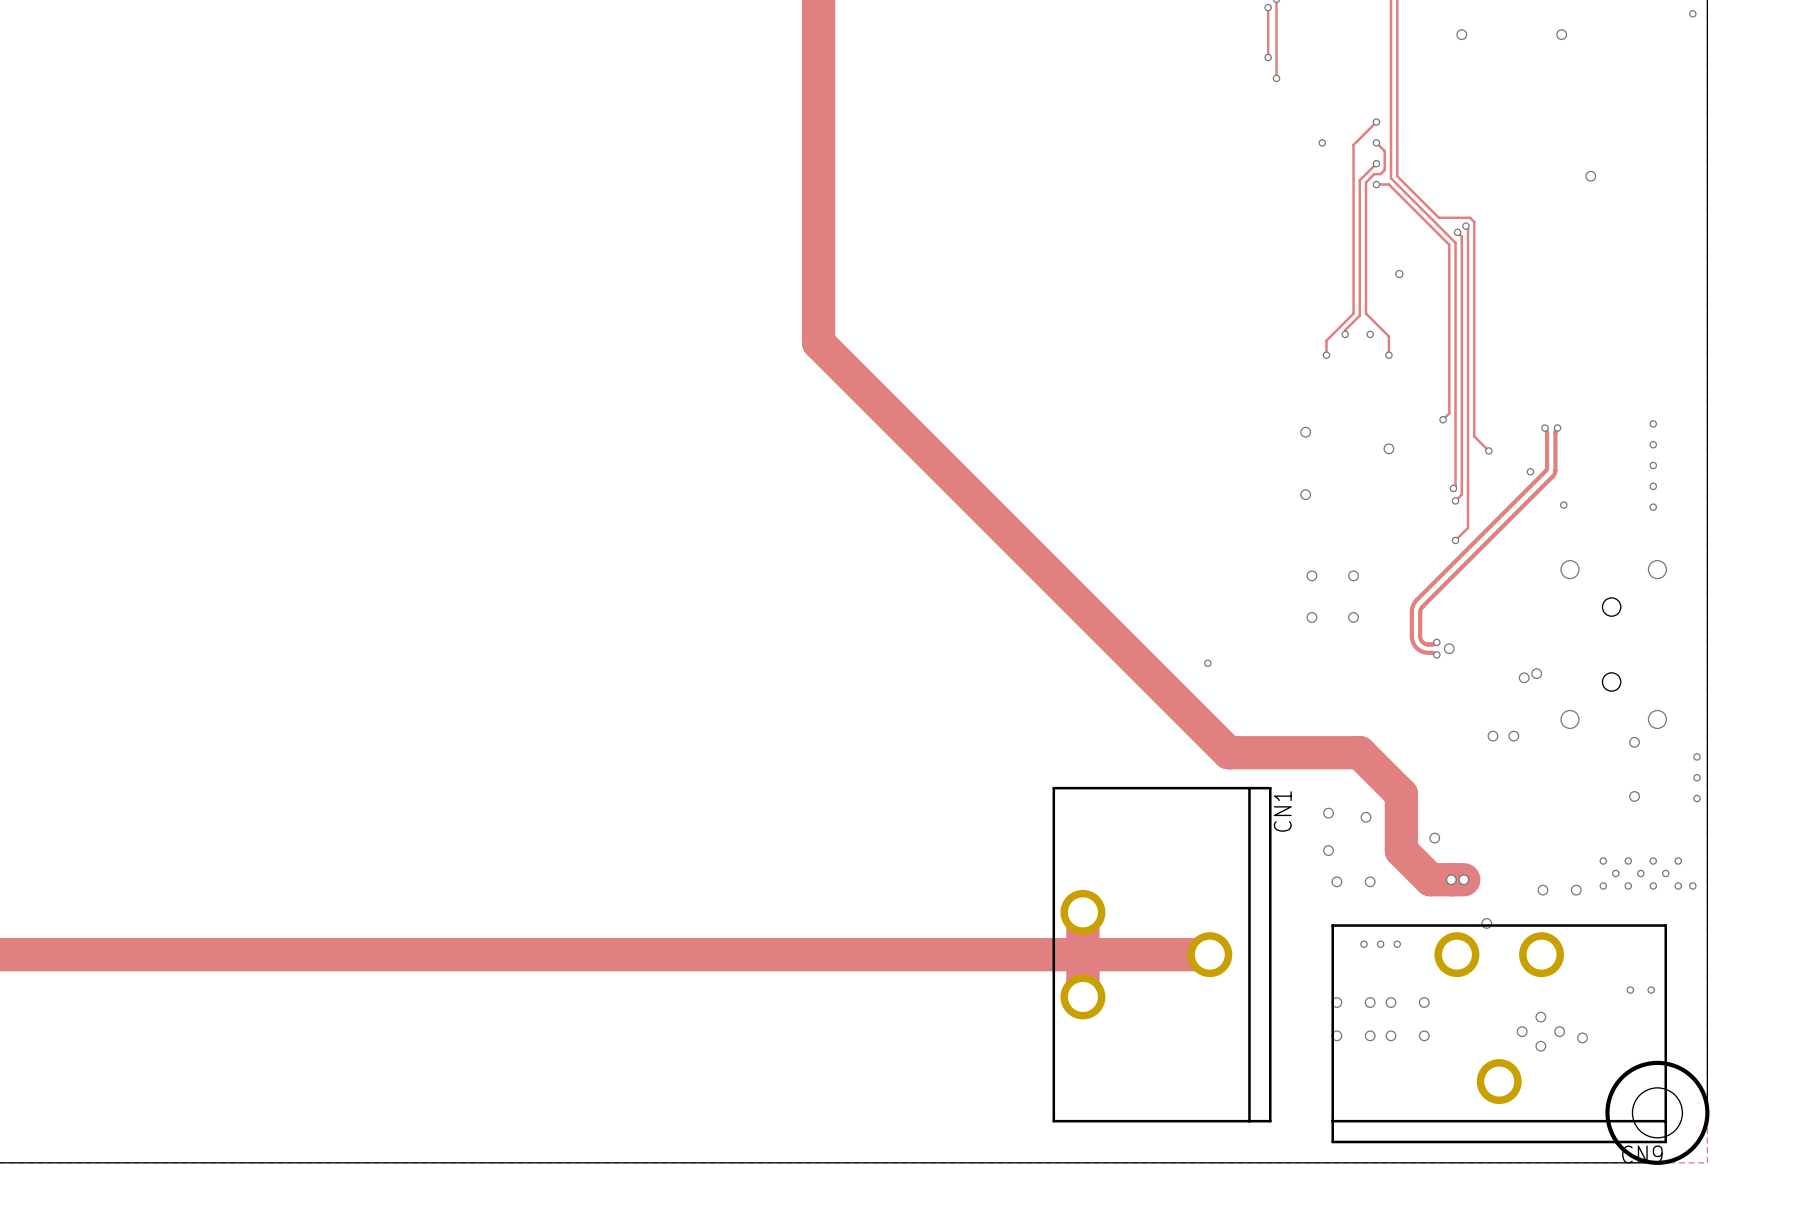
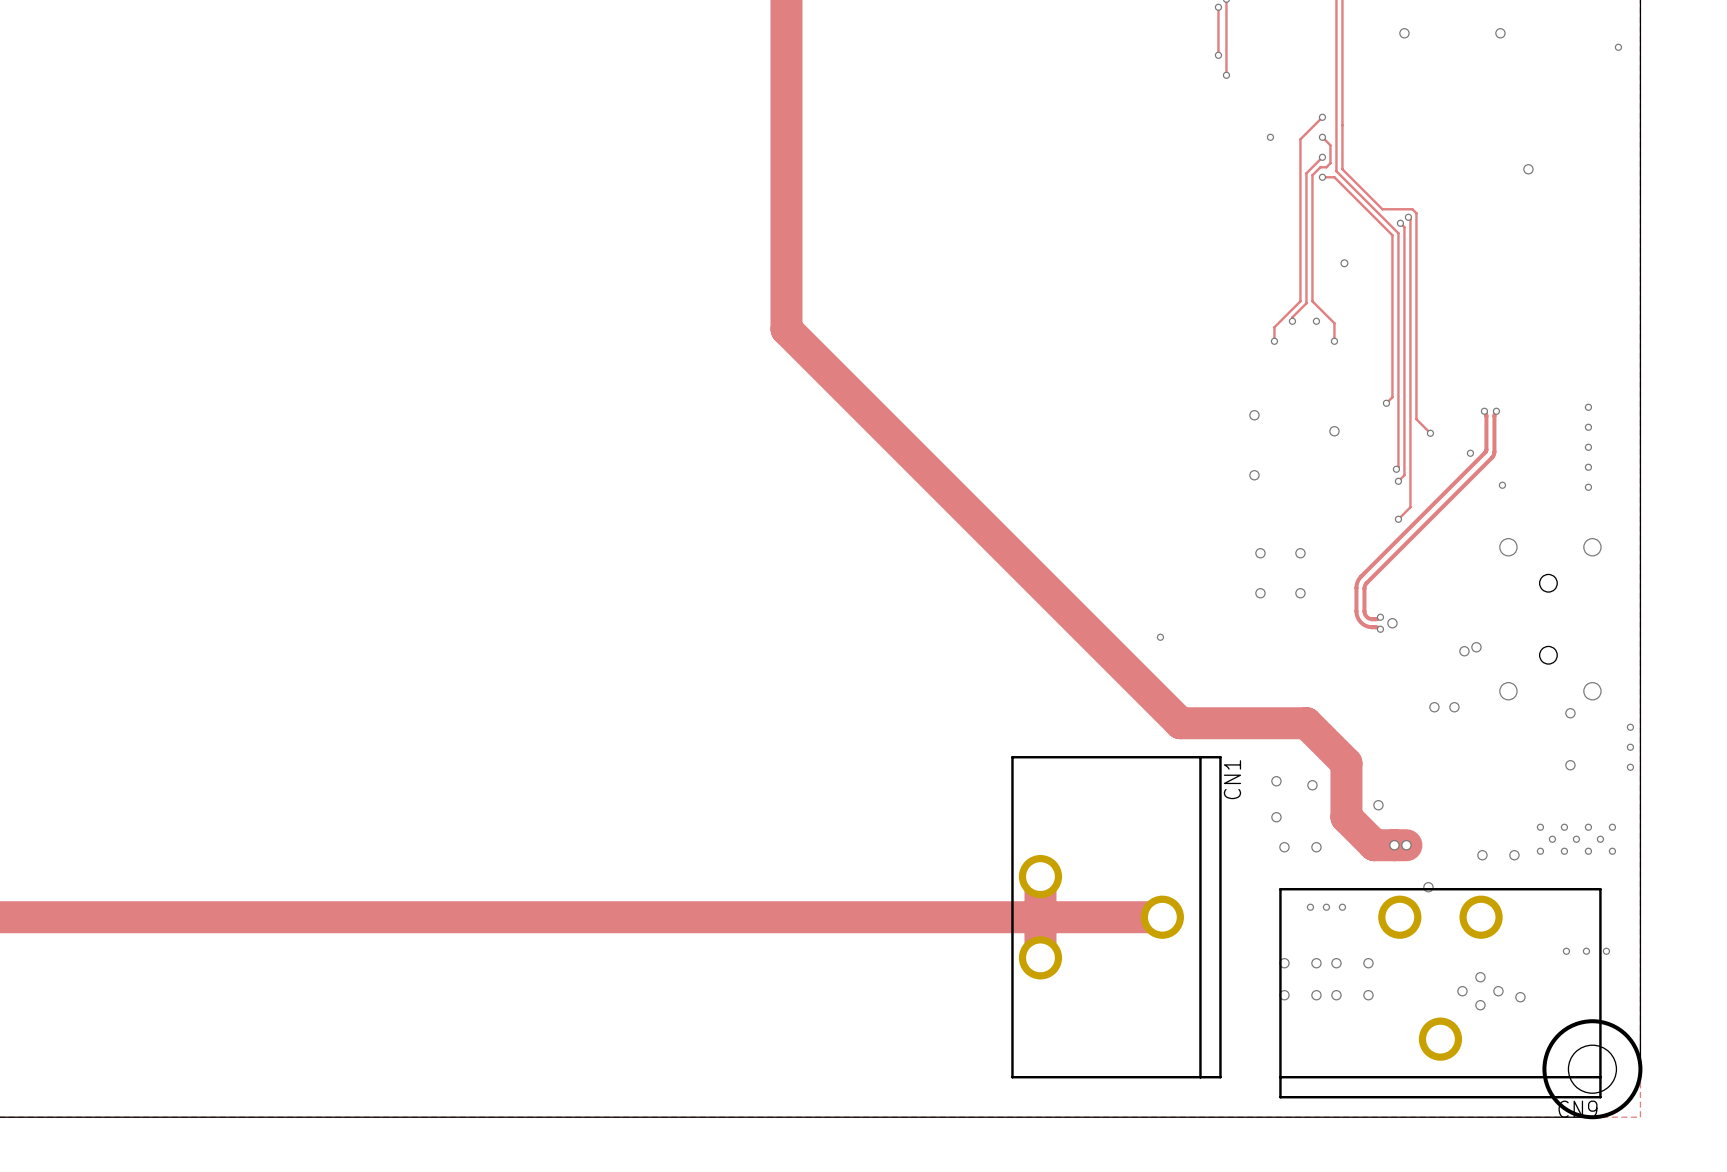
via position: (1692, 13) -> (1618, 47)
via: (1692, 885) -> none
via: none -> (1606, 951)

